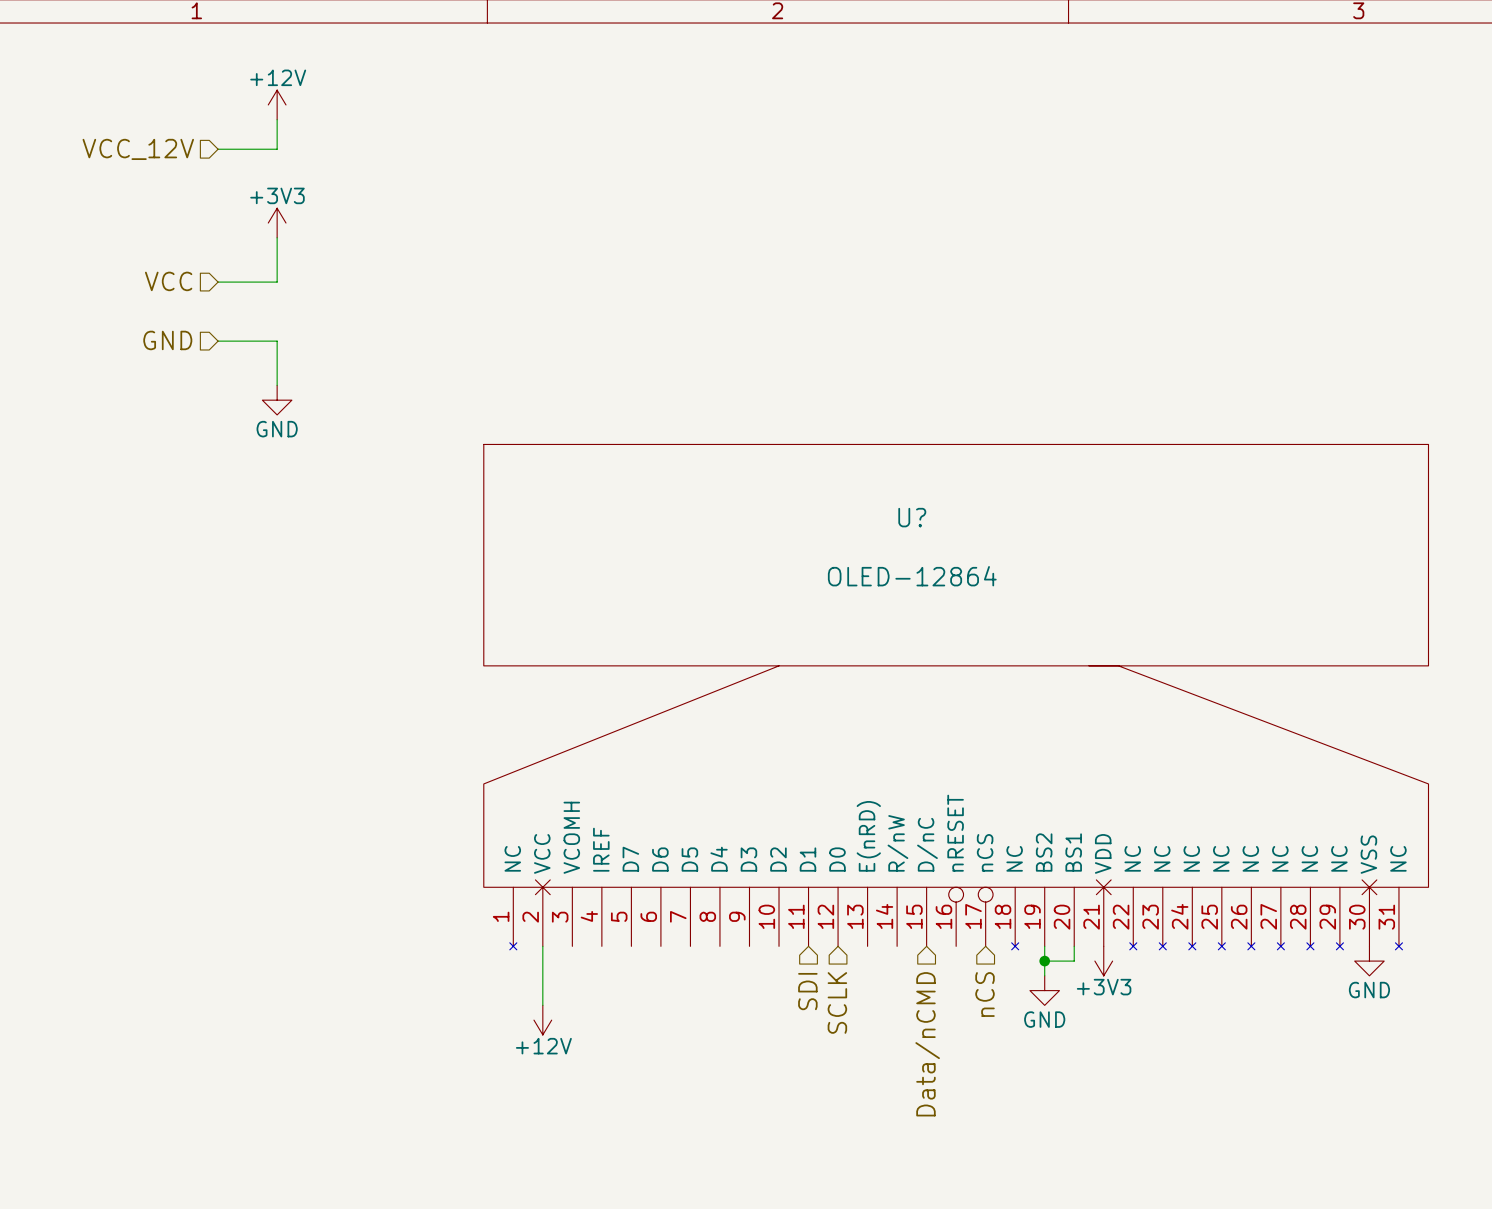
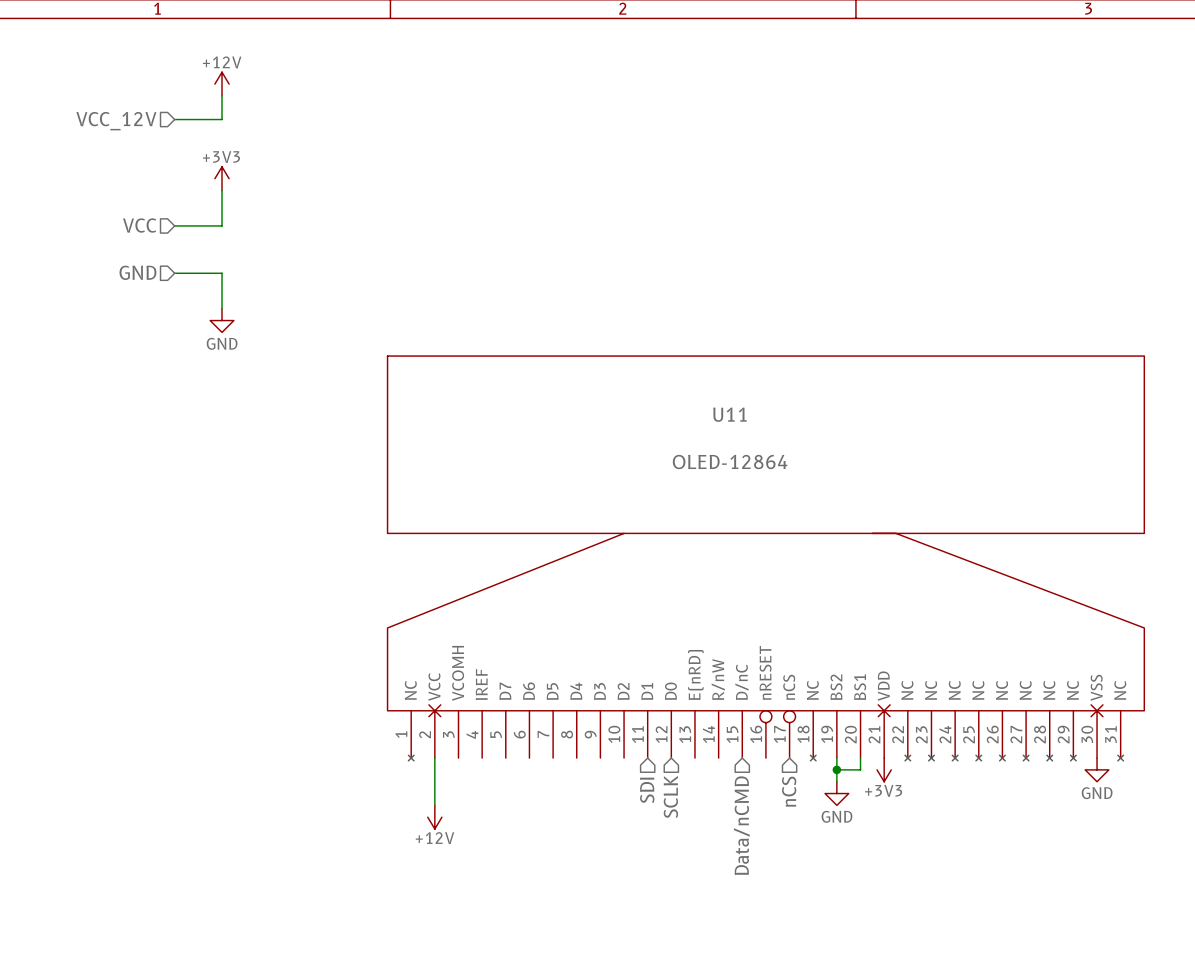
U? name: U? (912, 517) -> U11 (729, 414)

